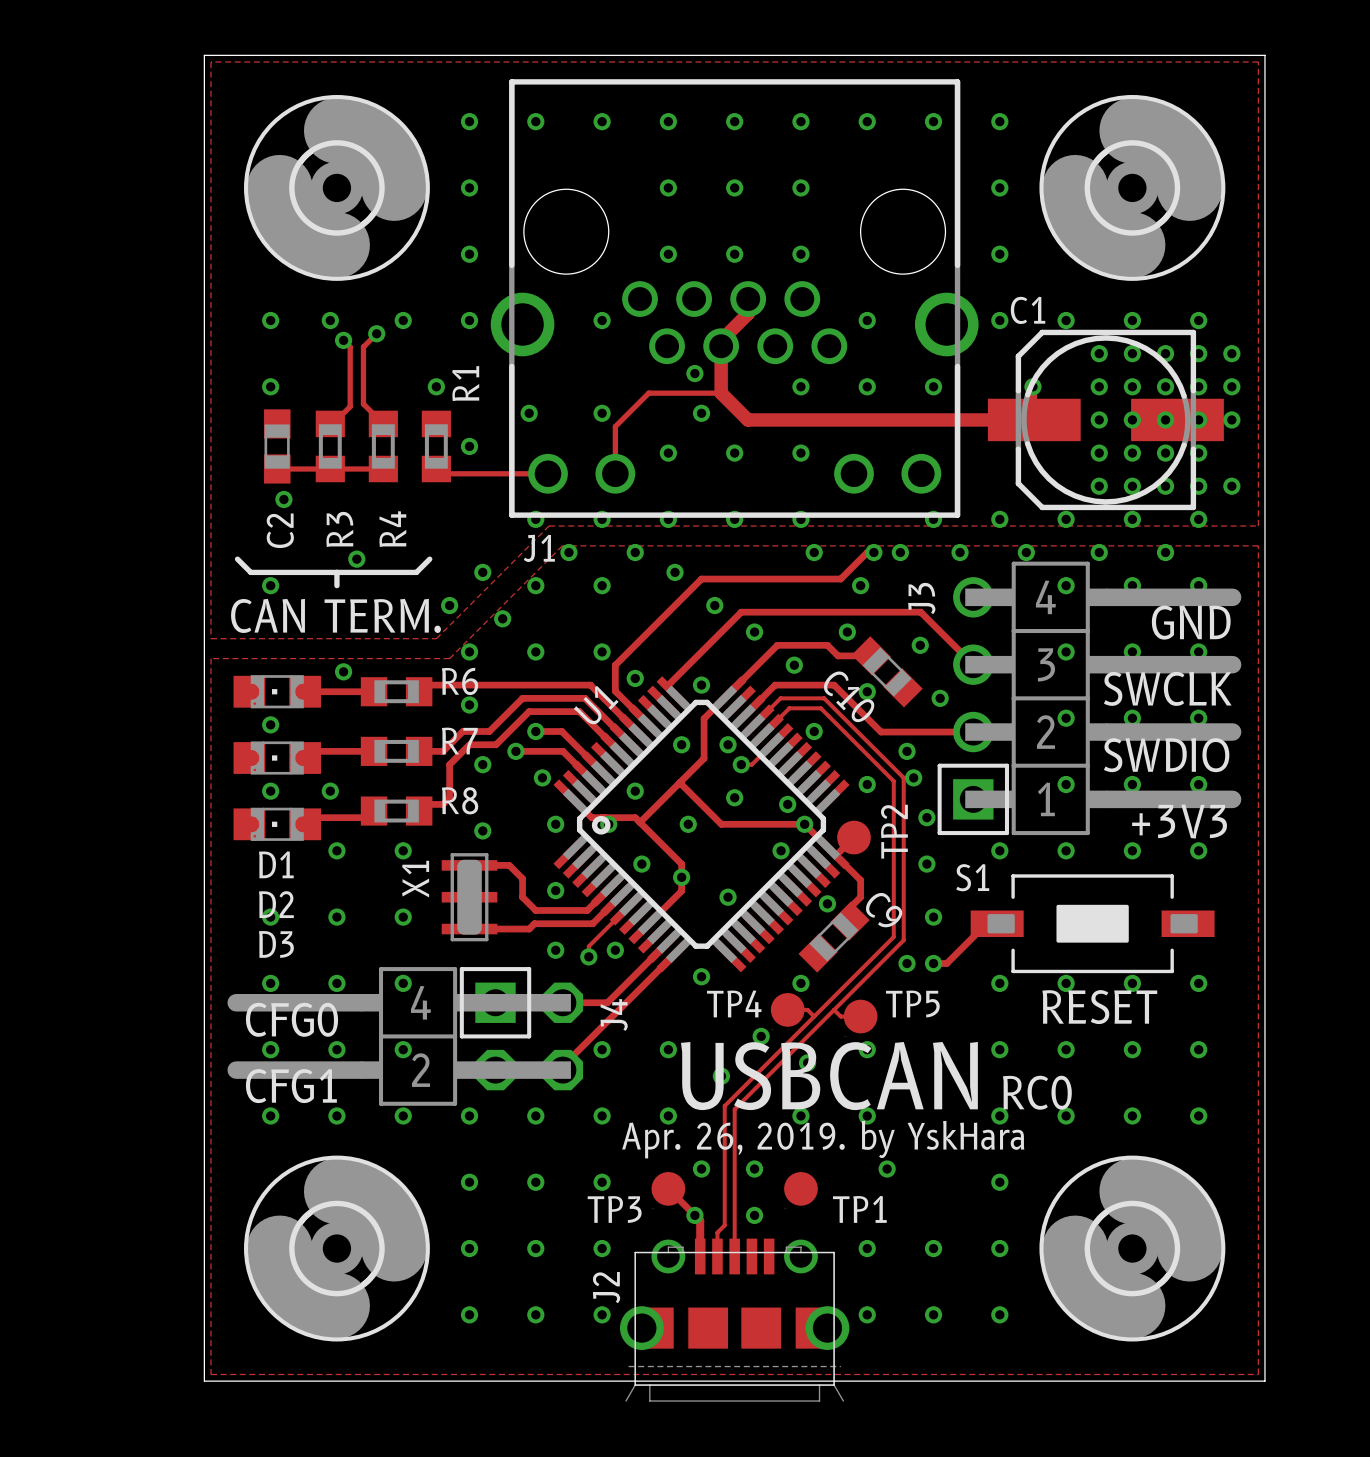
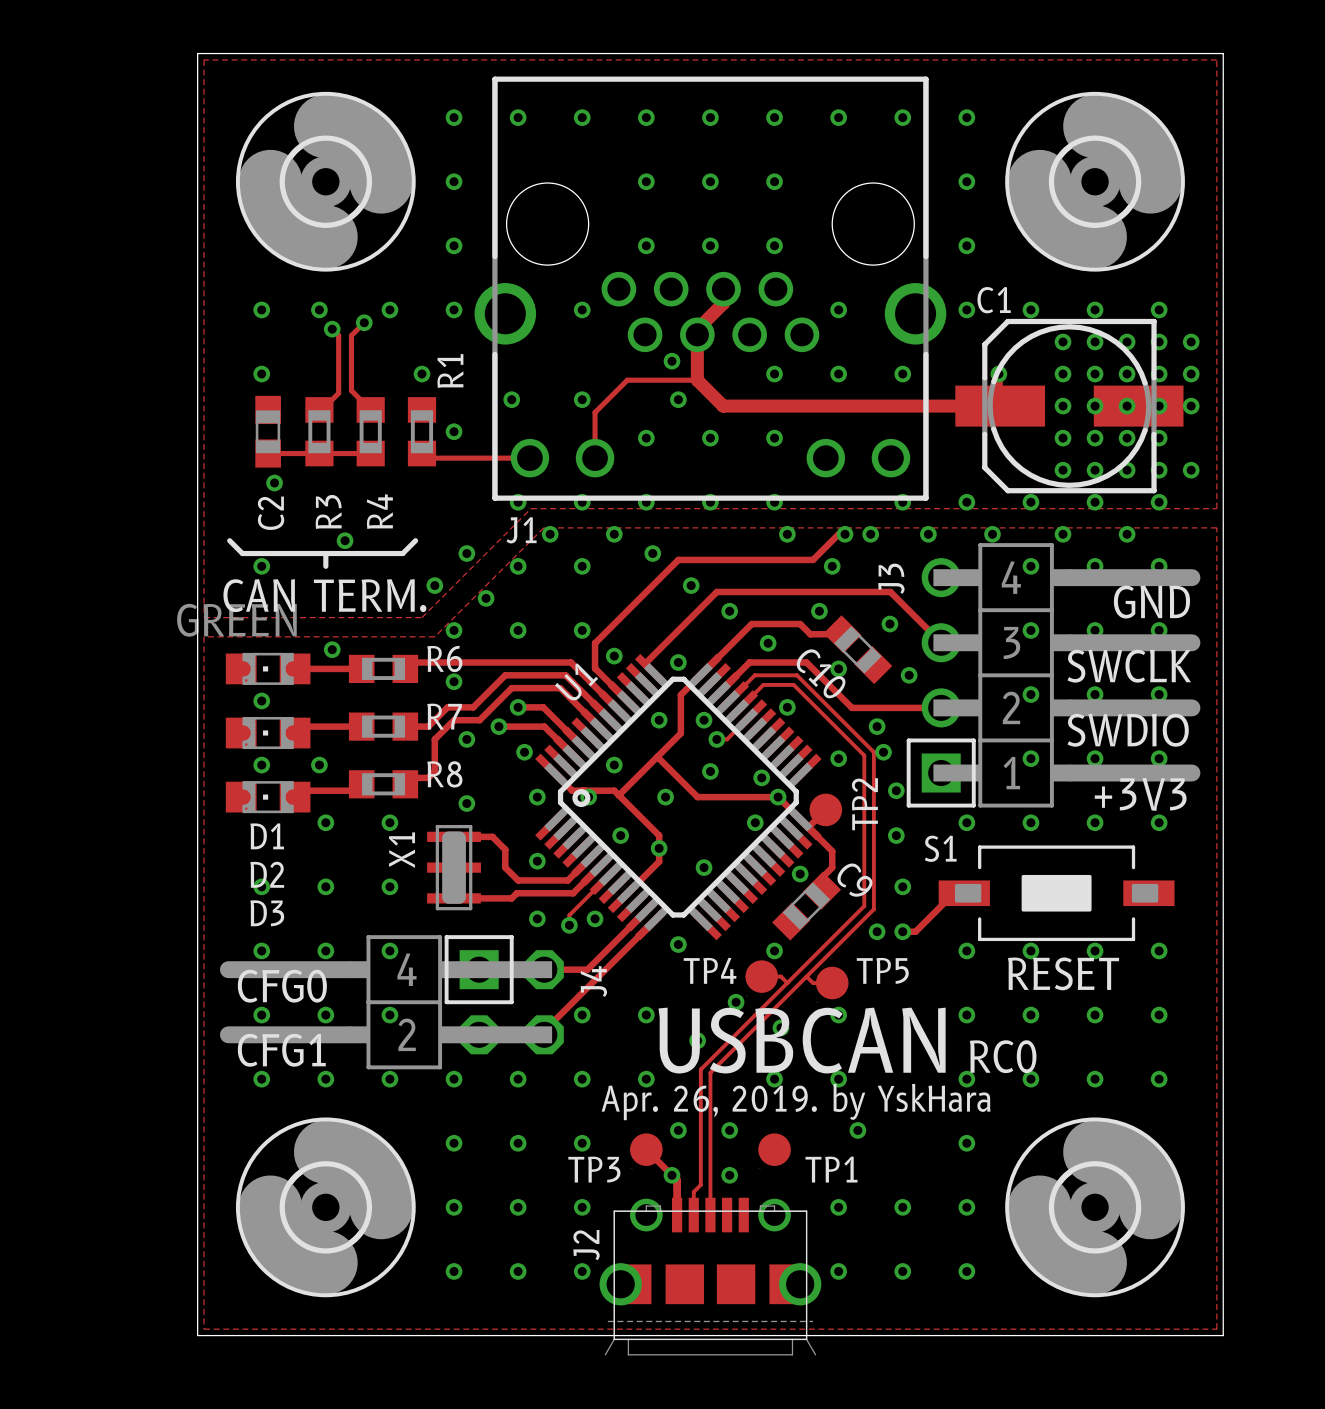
D1 value: none -> GREEN (236, 620)

